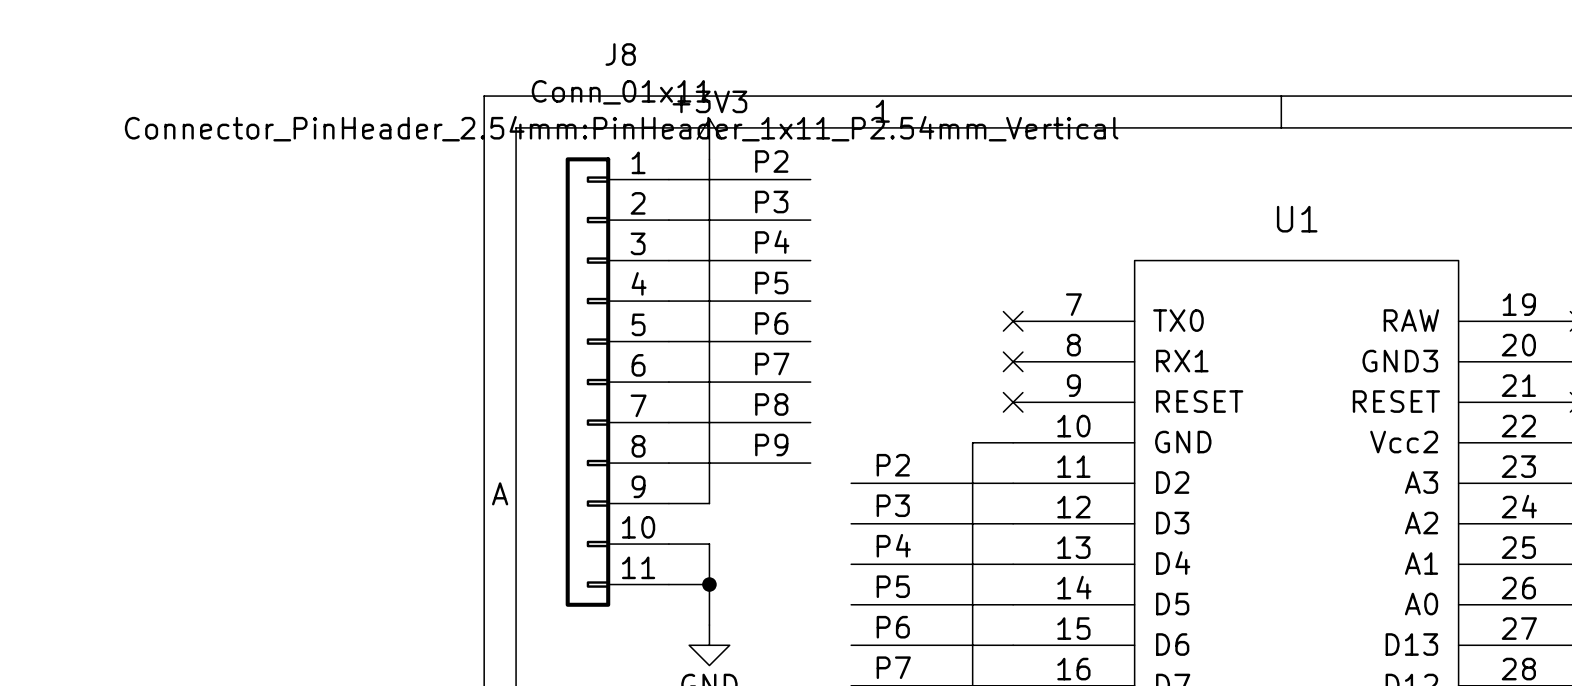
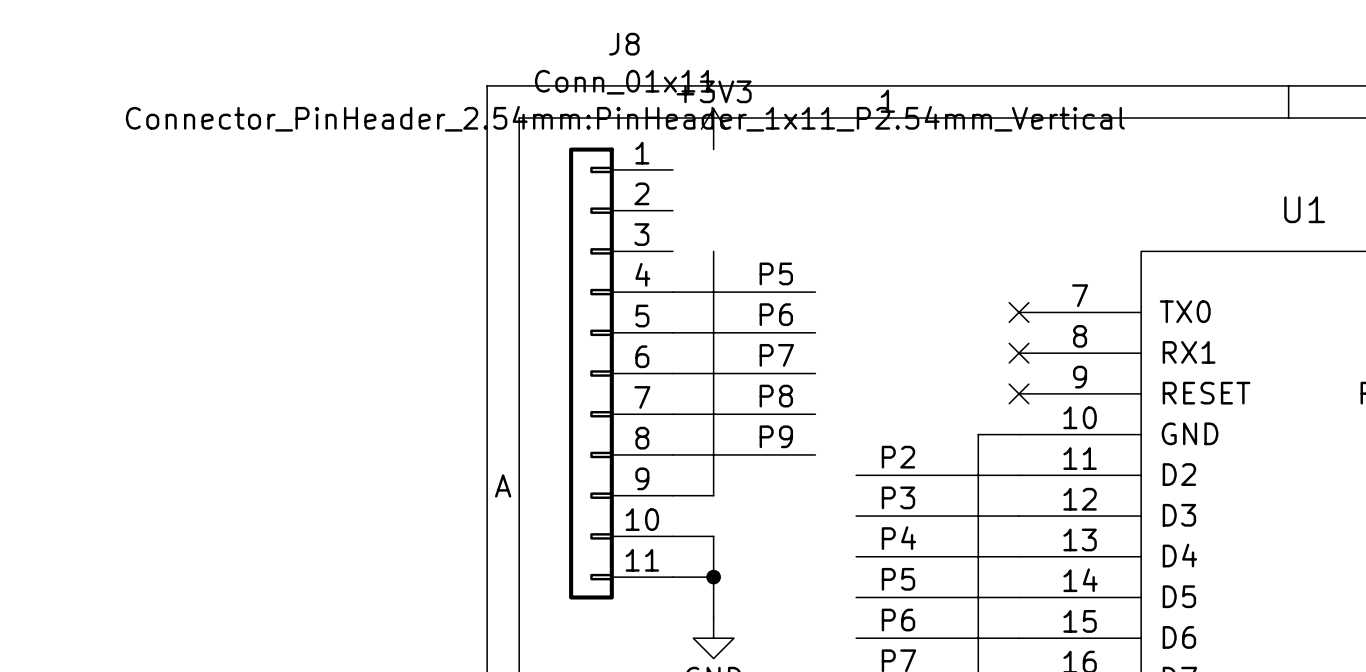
wire: (709, 159) (709, 260) -> none
label: P2 (771, 161) -> none
wire: (668, 179) (810, 179) -> none
label: P3 (771, 202) -> none
wire: (668, 220) (810, 220) -> none
label: P4 (772, 242) -> none
wire: (668, 260) (810, 260) -> none

